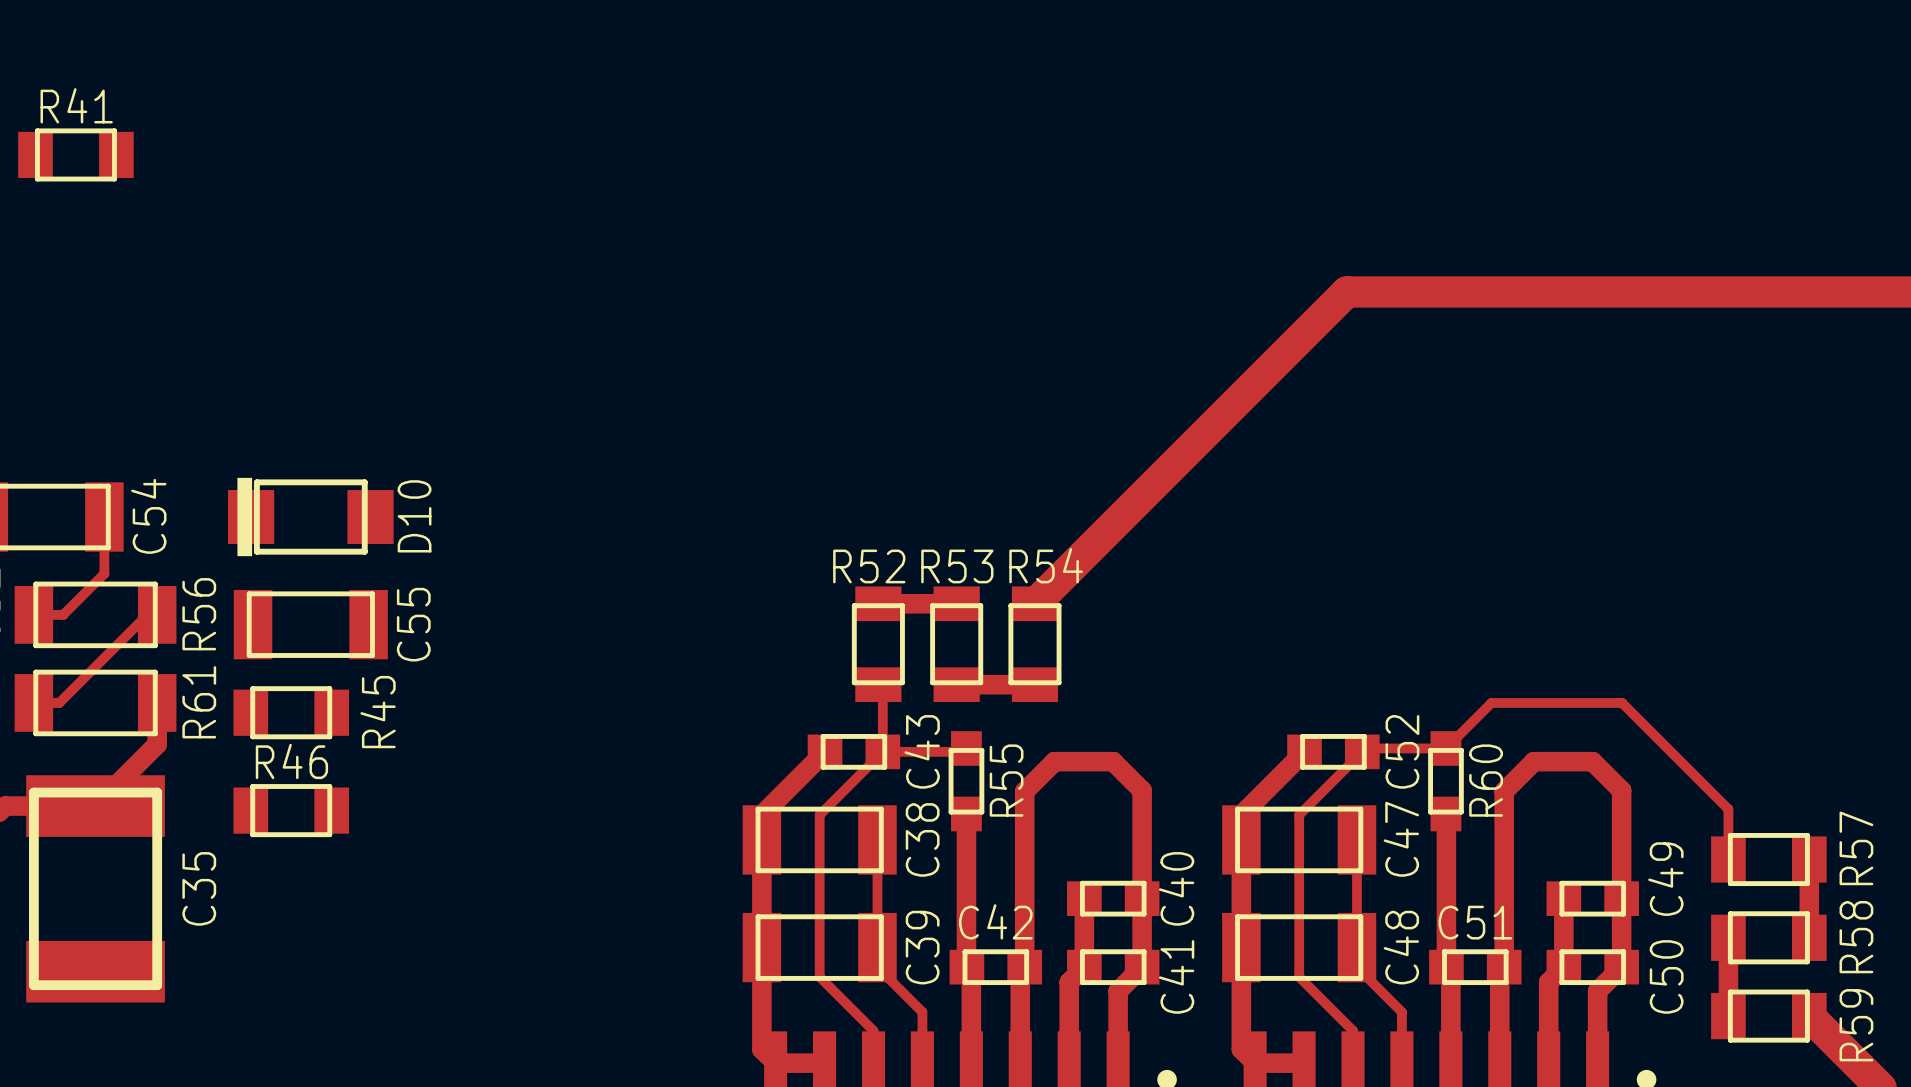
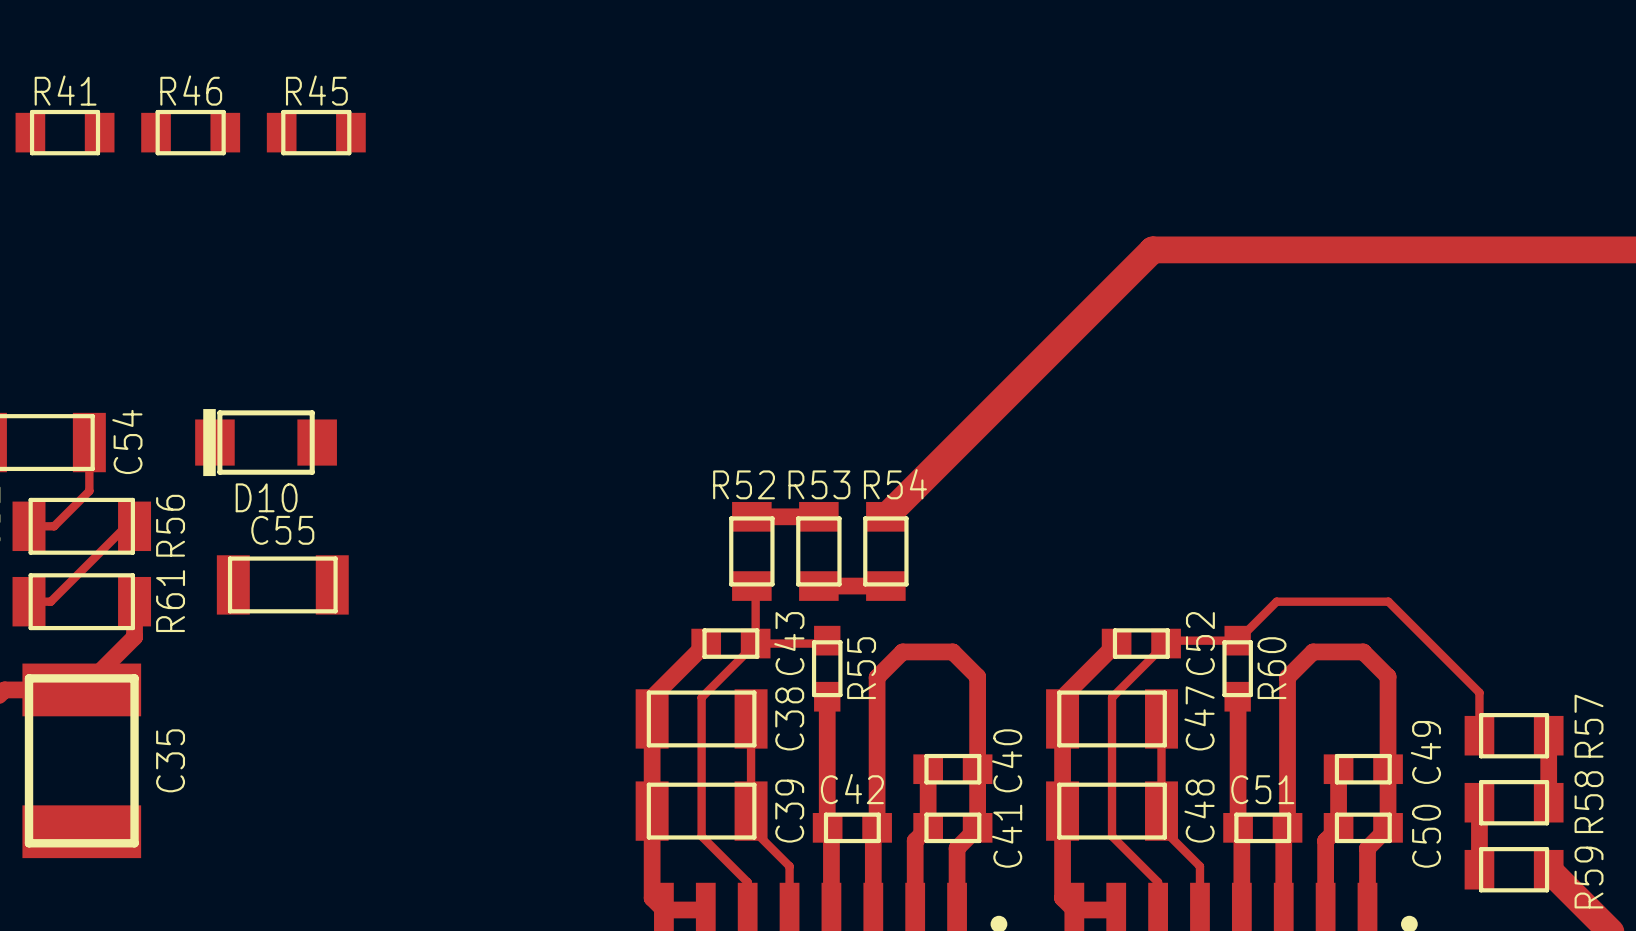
D10 name rotation: 0° (414, 516) -> 90° clockwise (266, 497)
D10 name position: D10 (414, 516) -> D10 (266, 497)
C55 position: (310, 624) -> (282, 584)
C55 name rotation: 0° (413, 624) -> 90° clockwise (282, 530)
R45 position: (291, 712) -> (316, 132)
R45 name rotation: 0° (378, 712) -> 90° clockwise (316, 90)
R45 name position: R45 (378, 712) -> R45 (316, 90)
R46 position: (291, 810) -> (190, 132)

